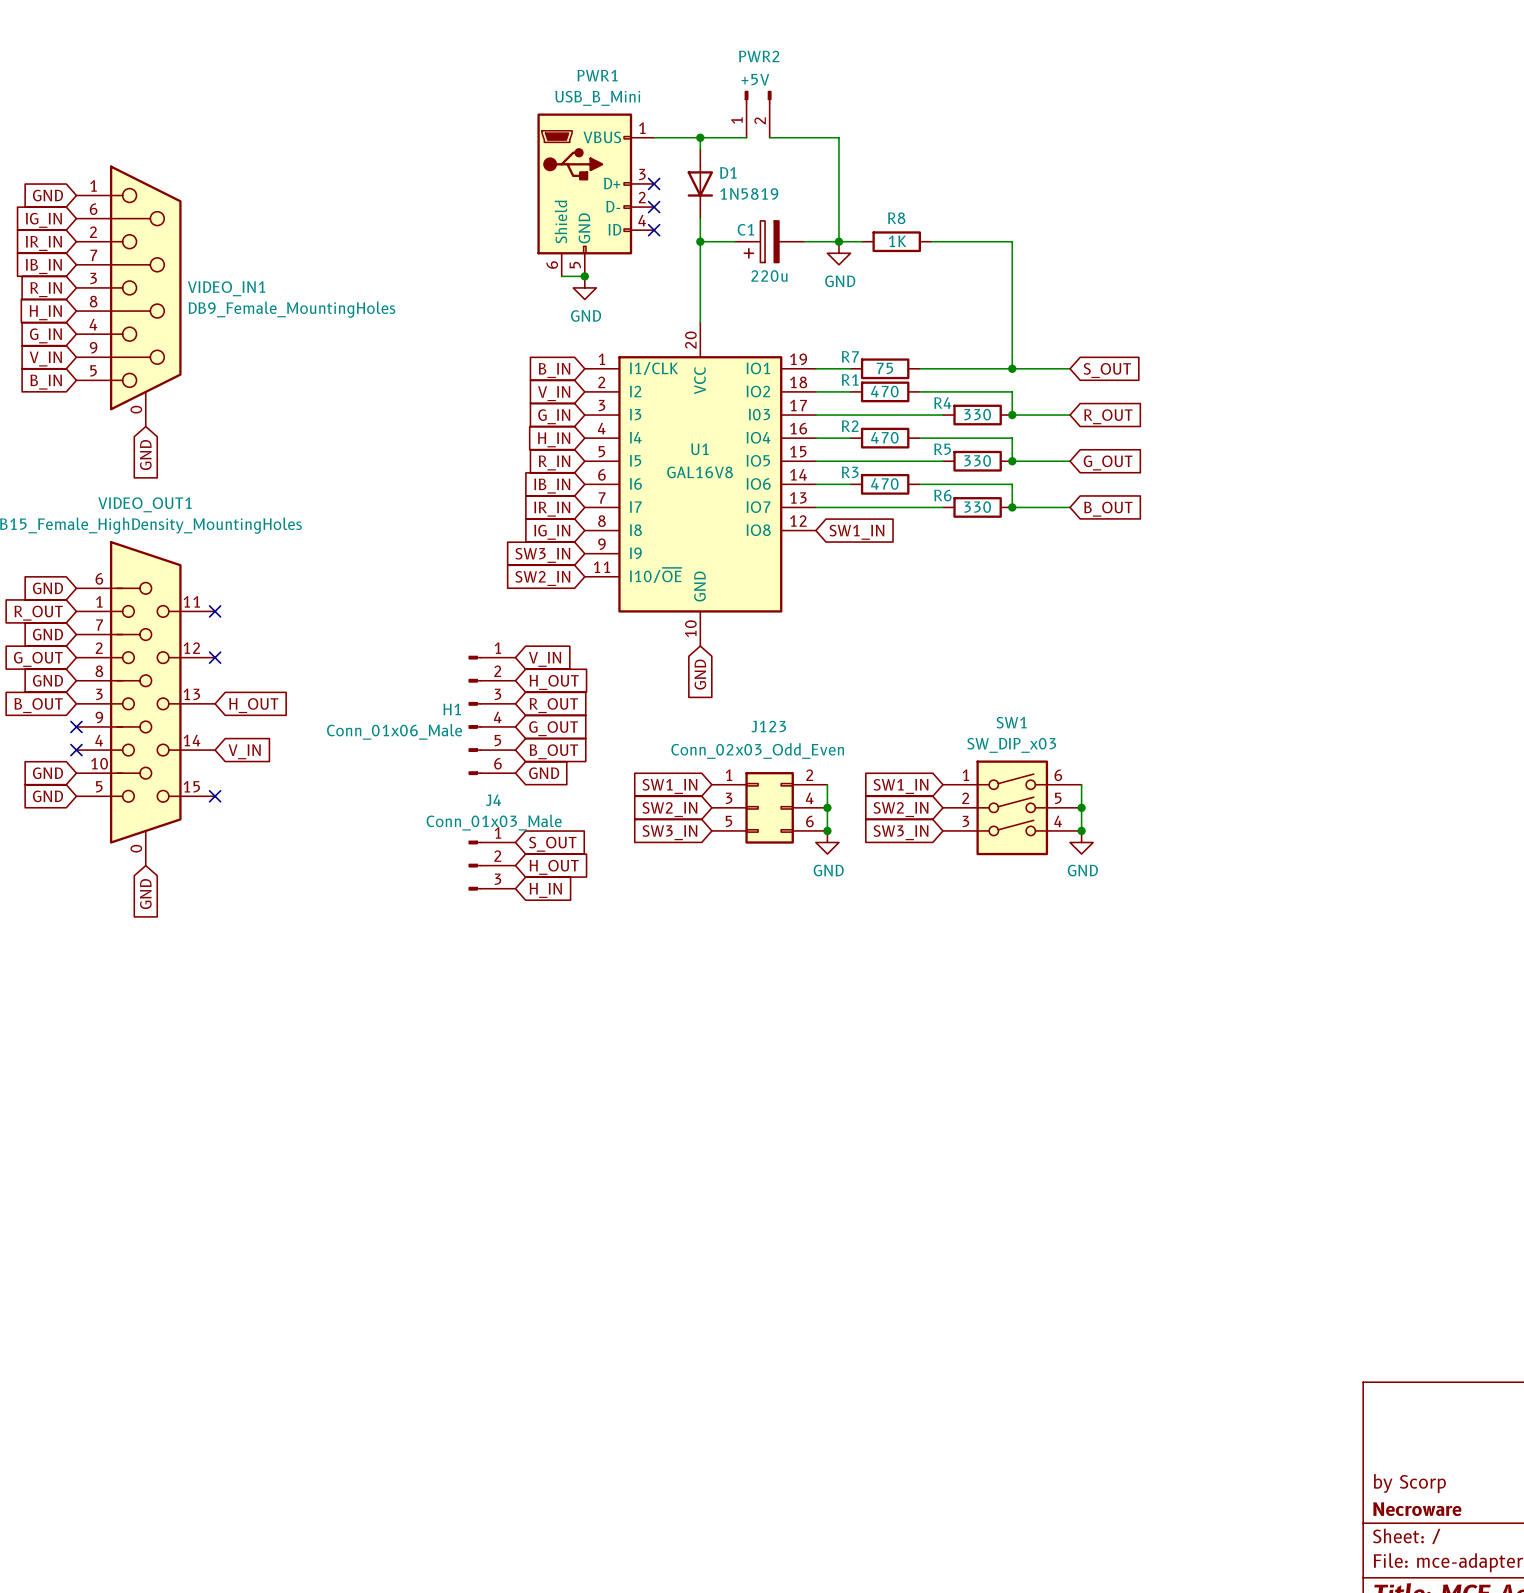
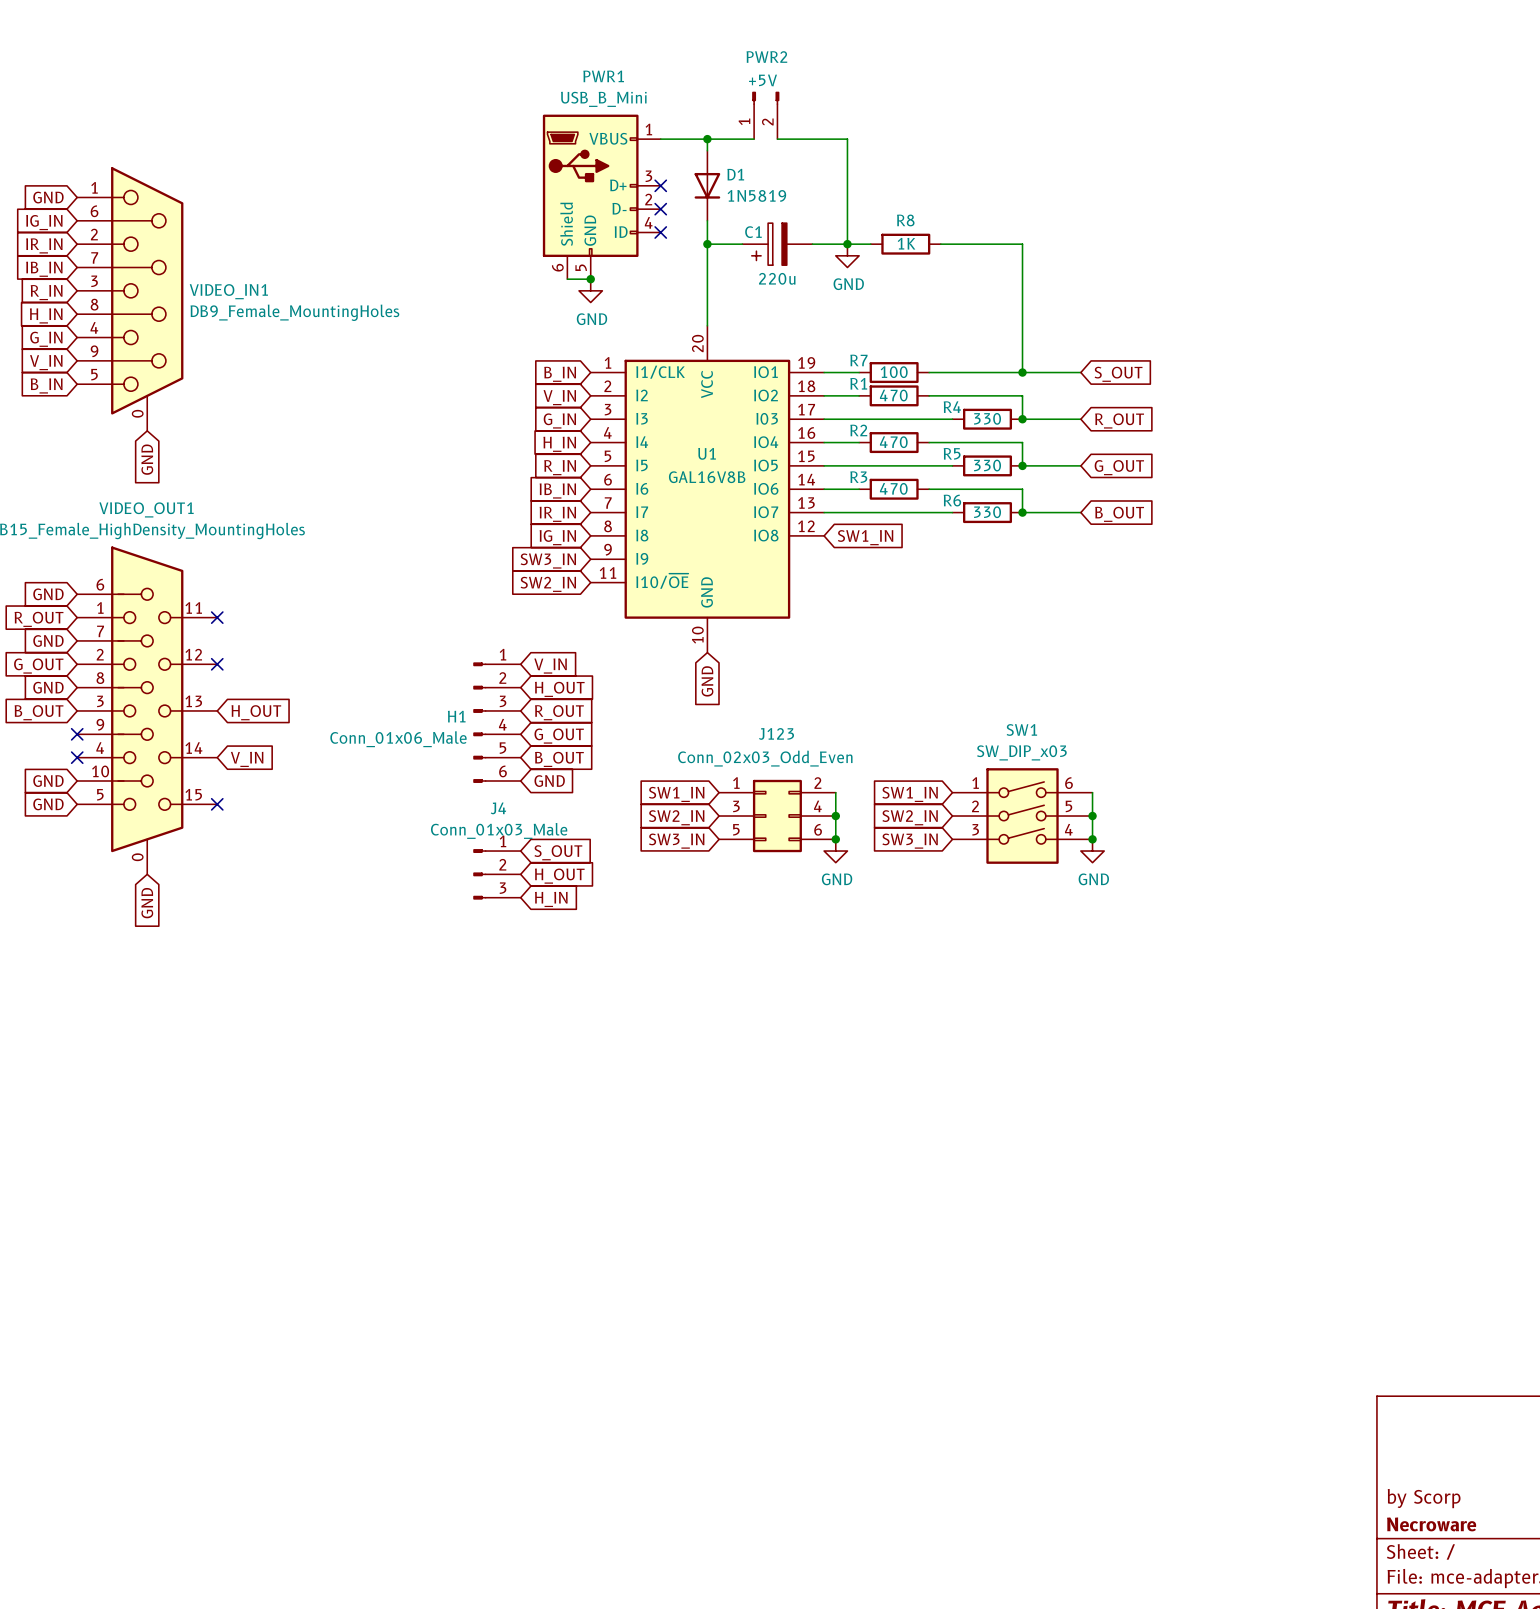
R7 value: 75 (884, 368) -> 100 (894, 372)
U1 value: GAL16V8 (700, 472) -> GAL16V8B (707, 477)

